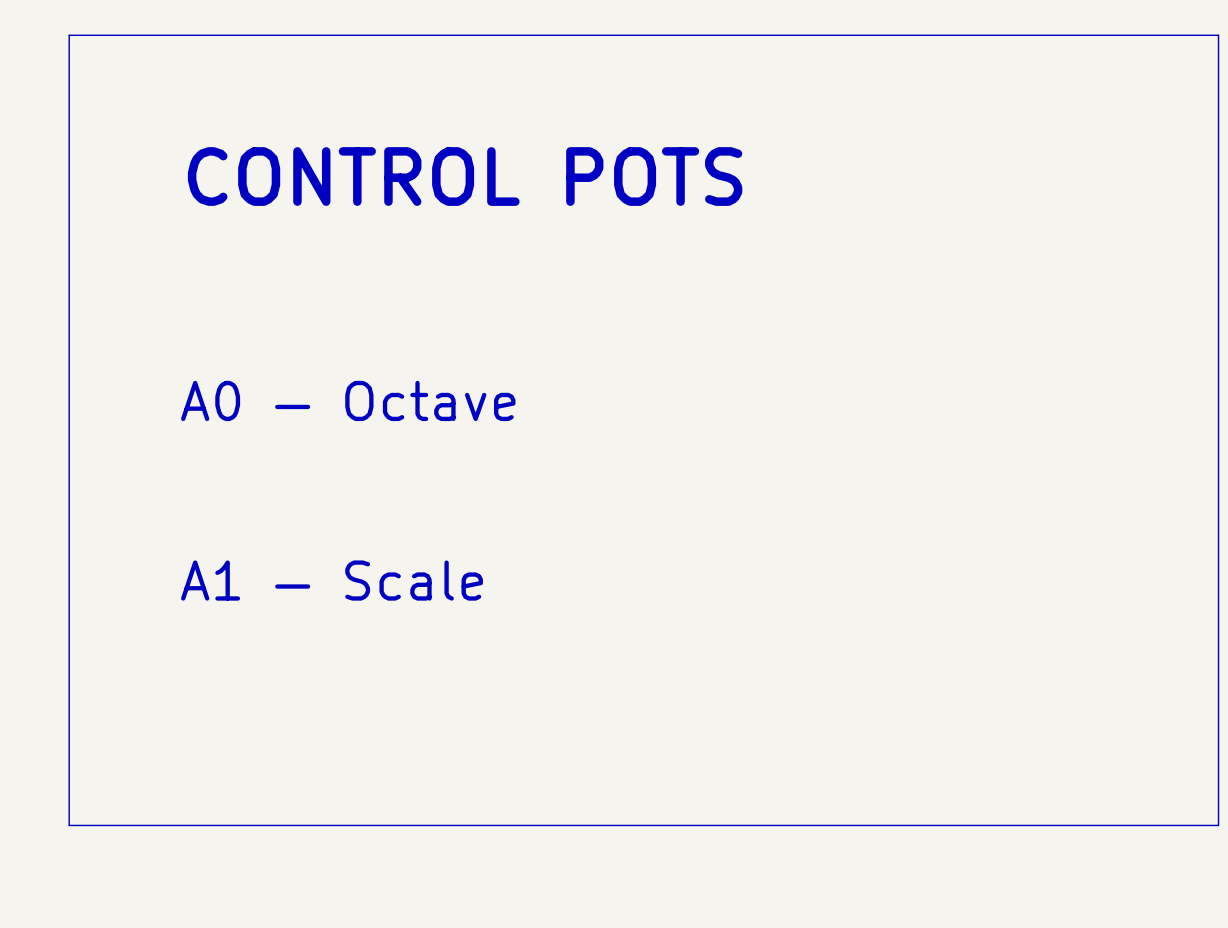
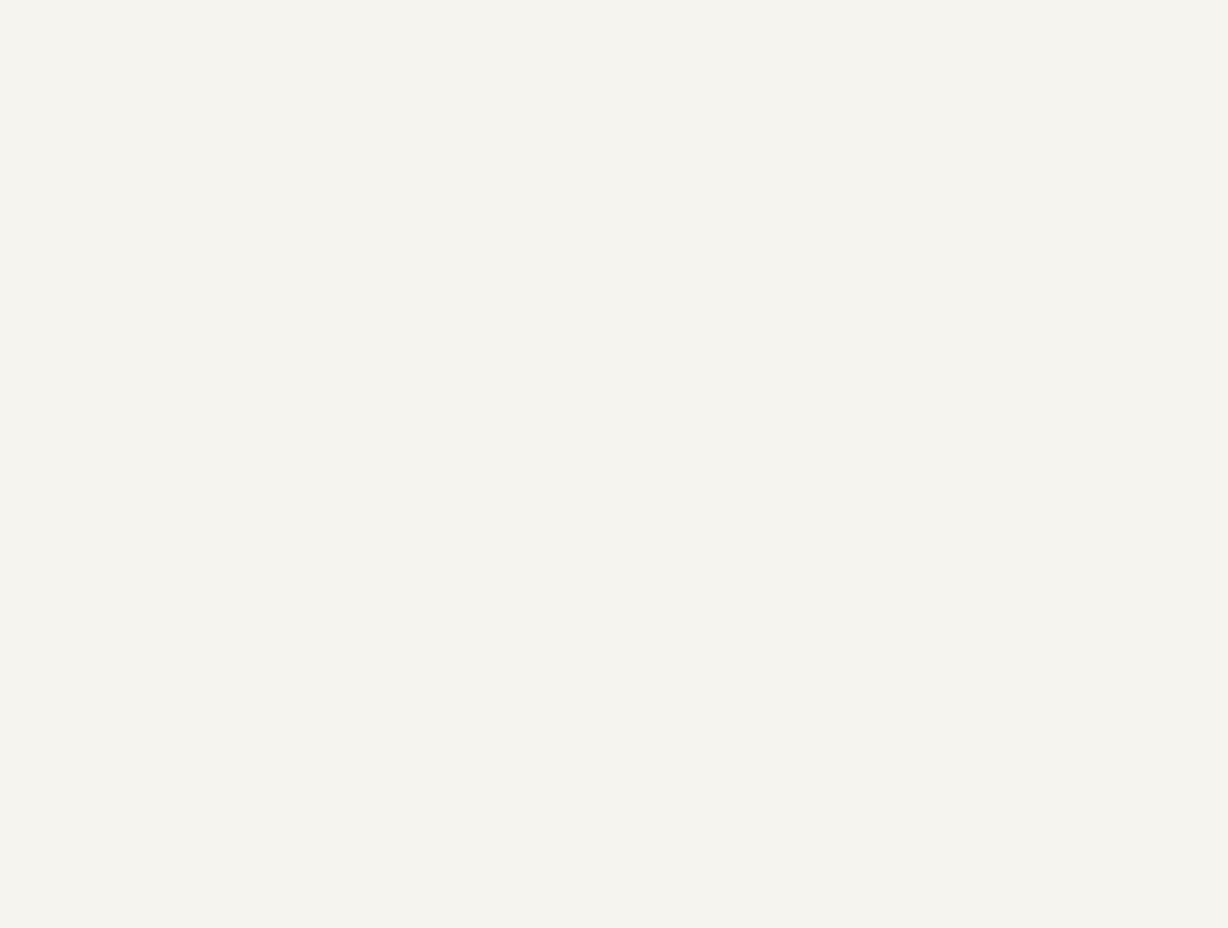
line: (69, 35) (1218, 35) (1218, 825) (69, 825) (69, 35) -> none
text: CONTROL POTS (465, 176) -> none
text: A0 — Octave (348, 400) -> none
text: A1 — Scale (332, 580) -> none

